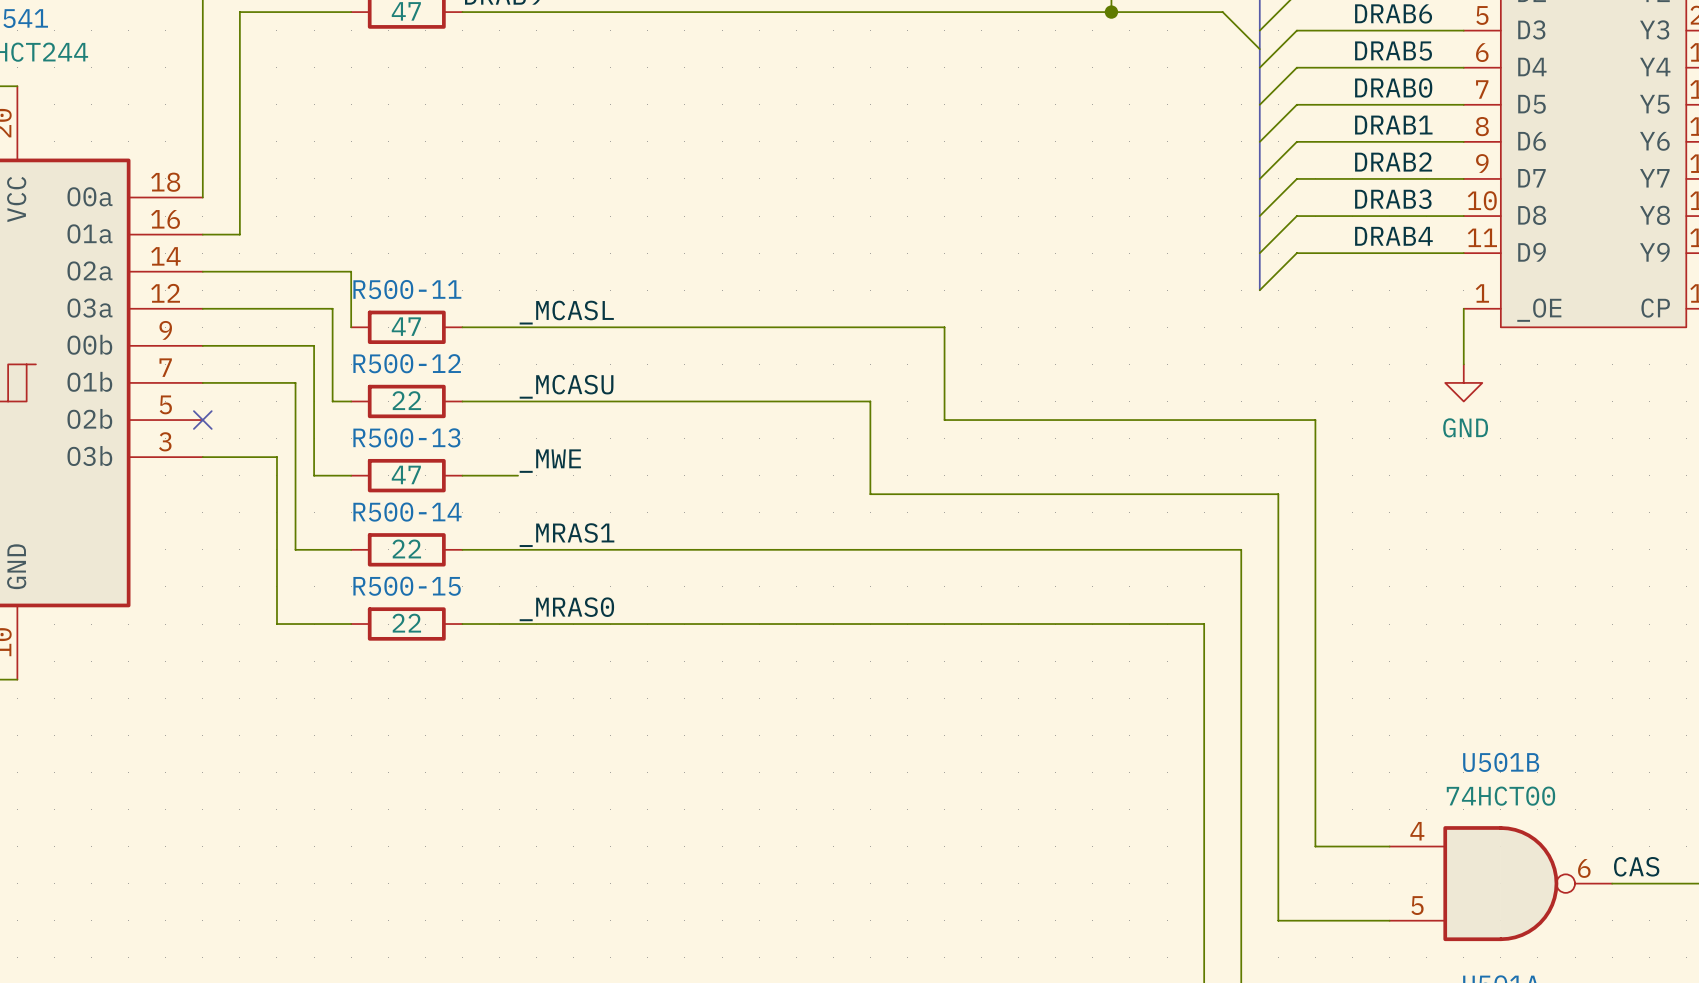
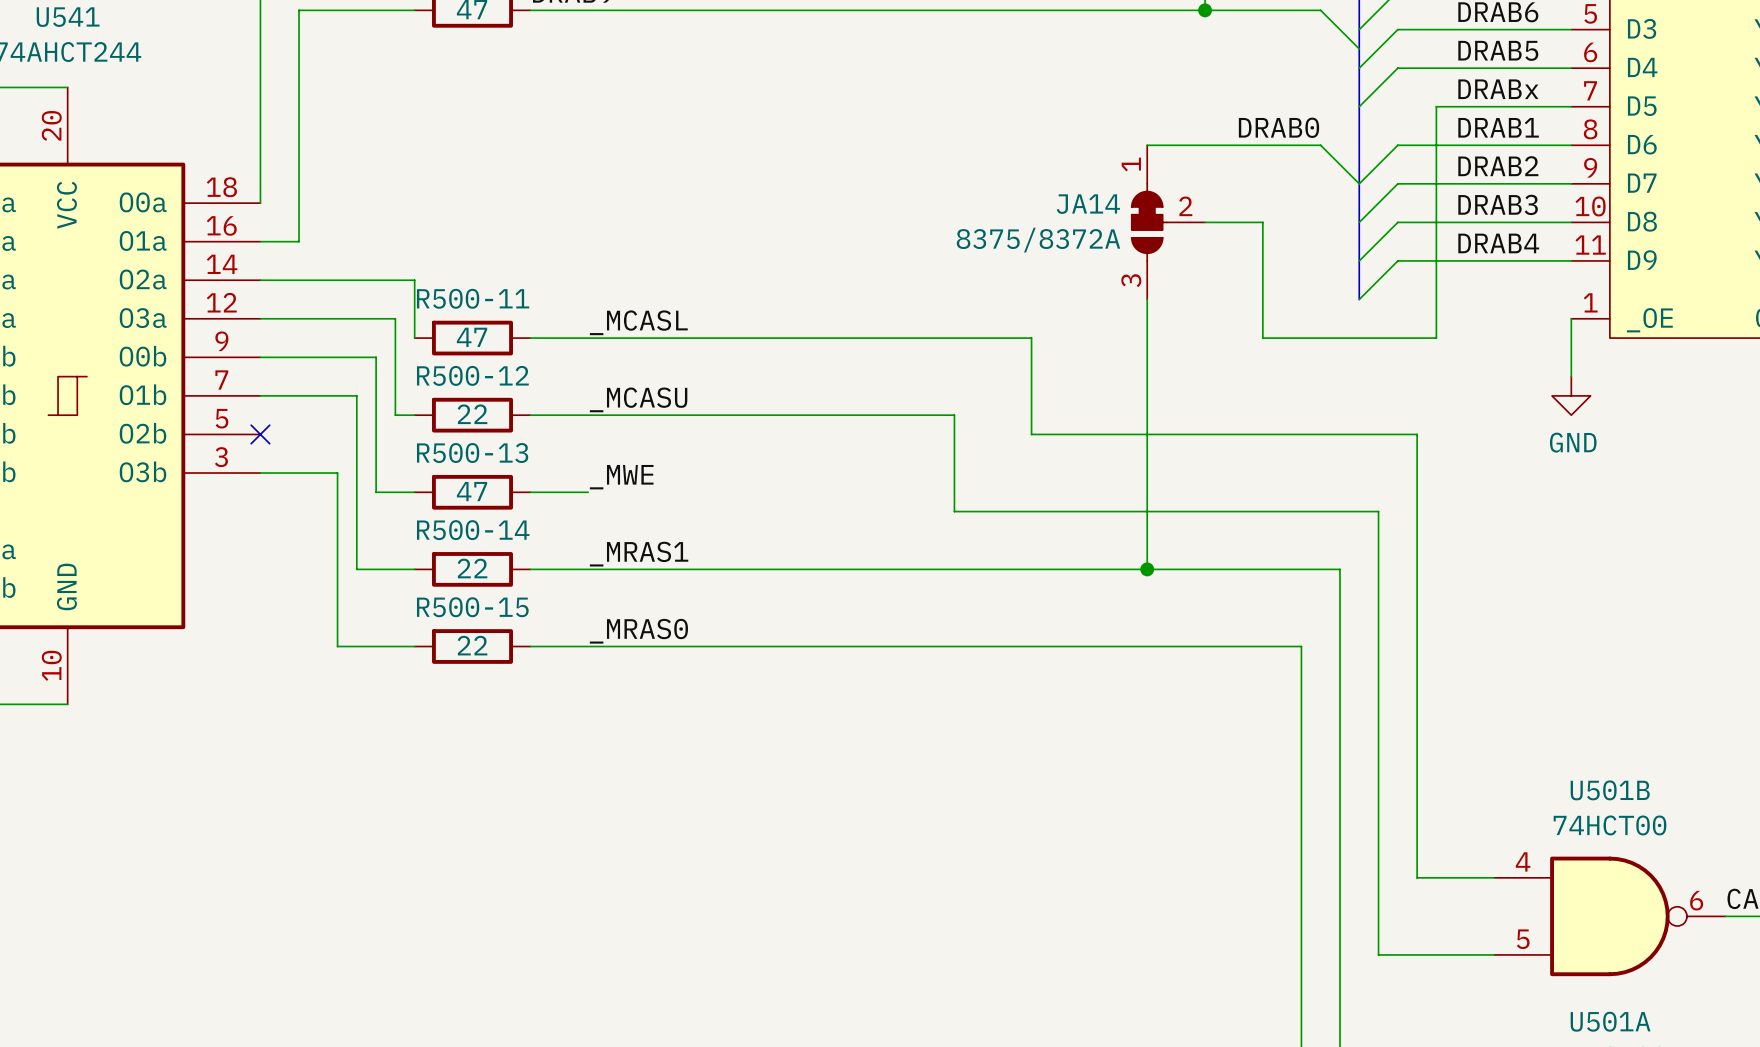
label: DRAB0 (1393, 87) -> DRABx (1498, 89)
wire: (1333, 104) (1296, 104) (1259, 141) -> (1436, 106) (1436, 338) (1262, 338) (1262, 222) (1205, 222)
label: none -> DRAB0 (1279, 127)
wire: none -> (1147, 145) (1320, 145) (1359, 183)
JA14: none -> 8375/8372A (1168, 222)
wire: none -> (1147, 299) (1147, 569)
junction: none -> (1147, 569)

